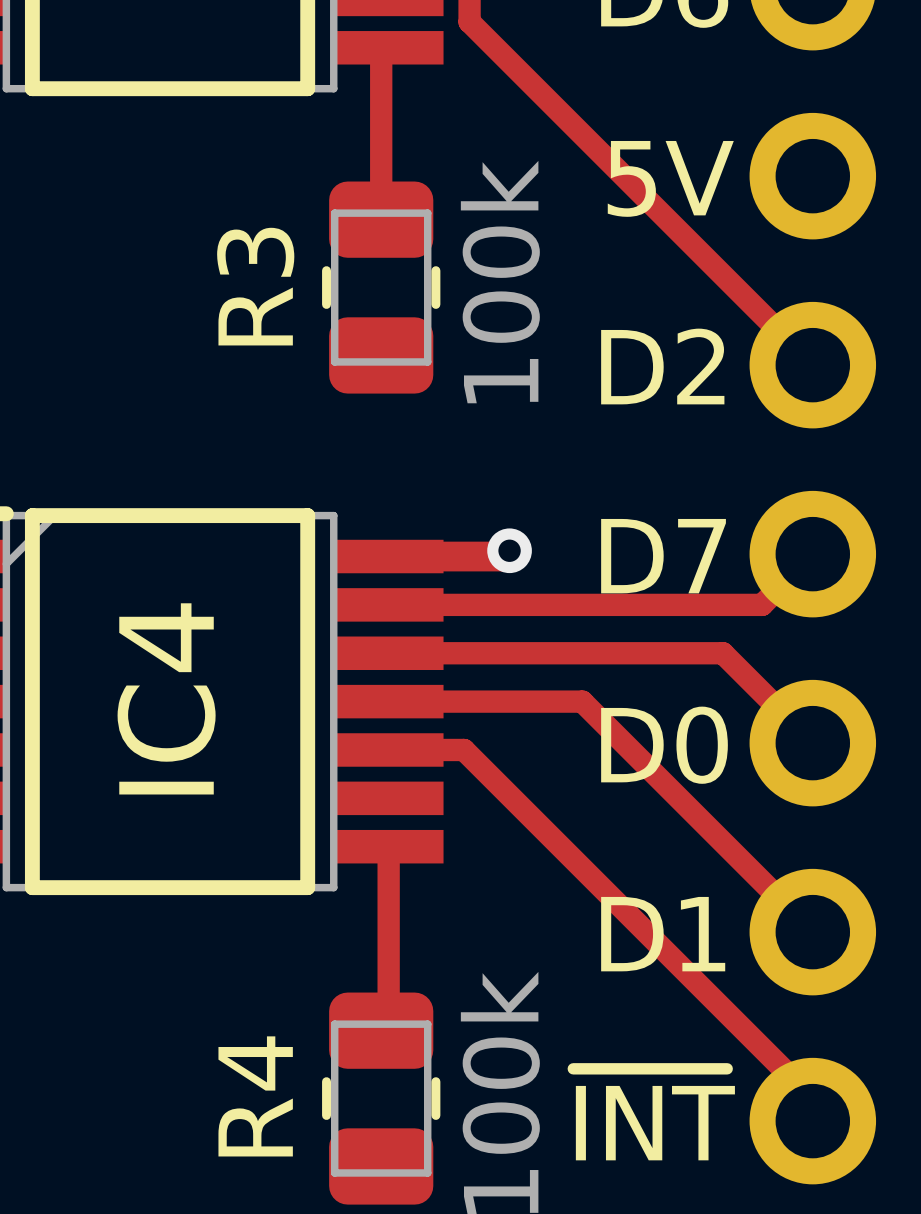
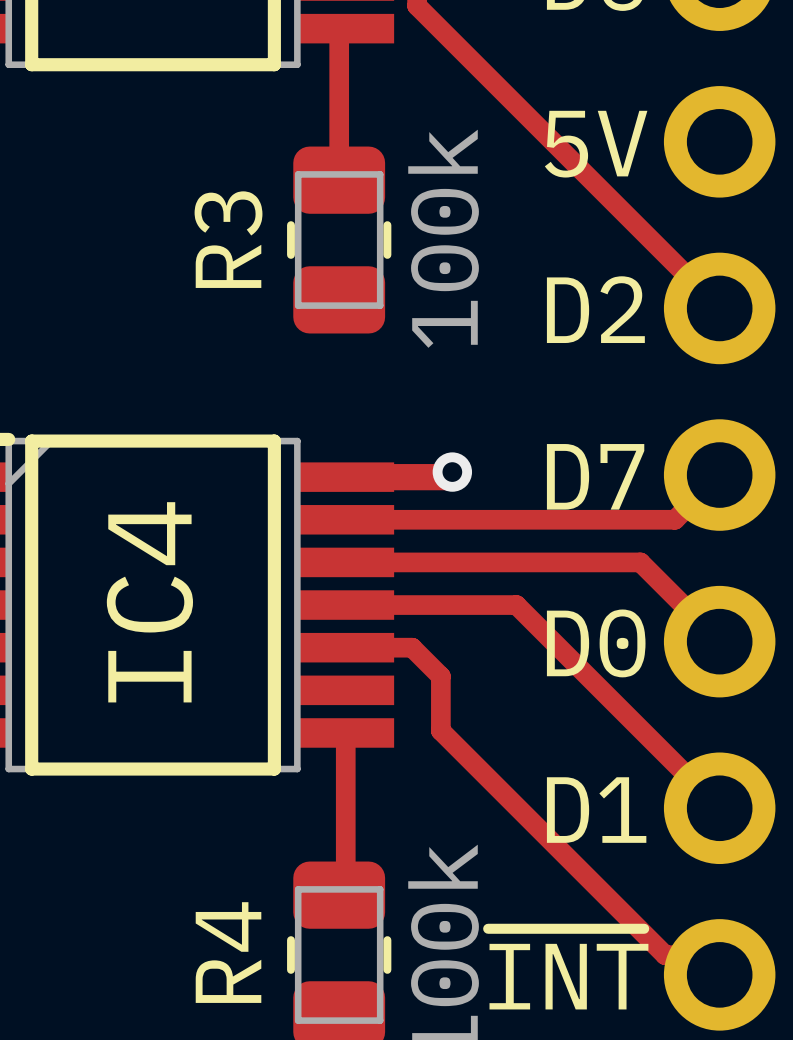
track: (496, 782) (812, 1098) -> (440, 676) (440, 730) (665, 955) (719, 955)

